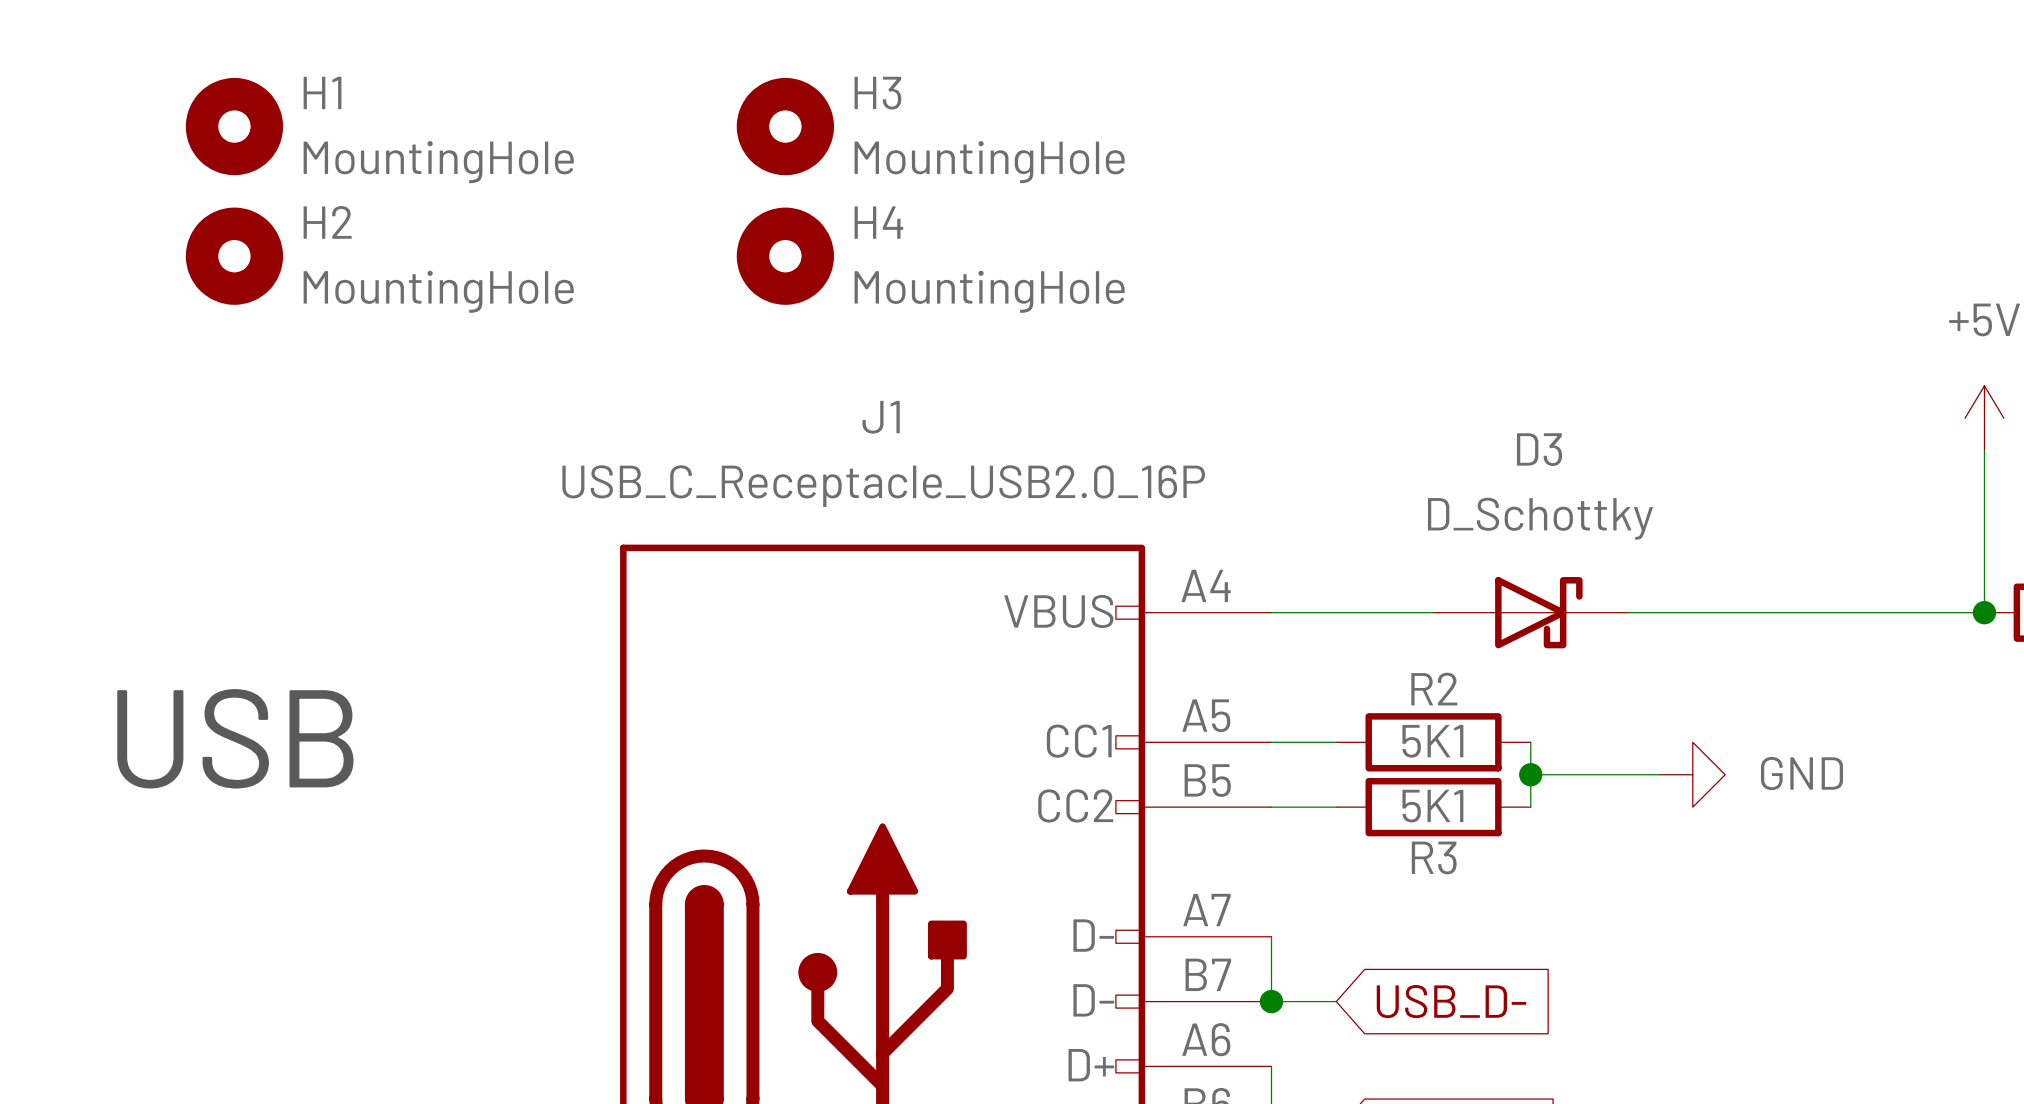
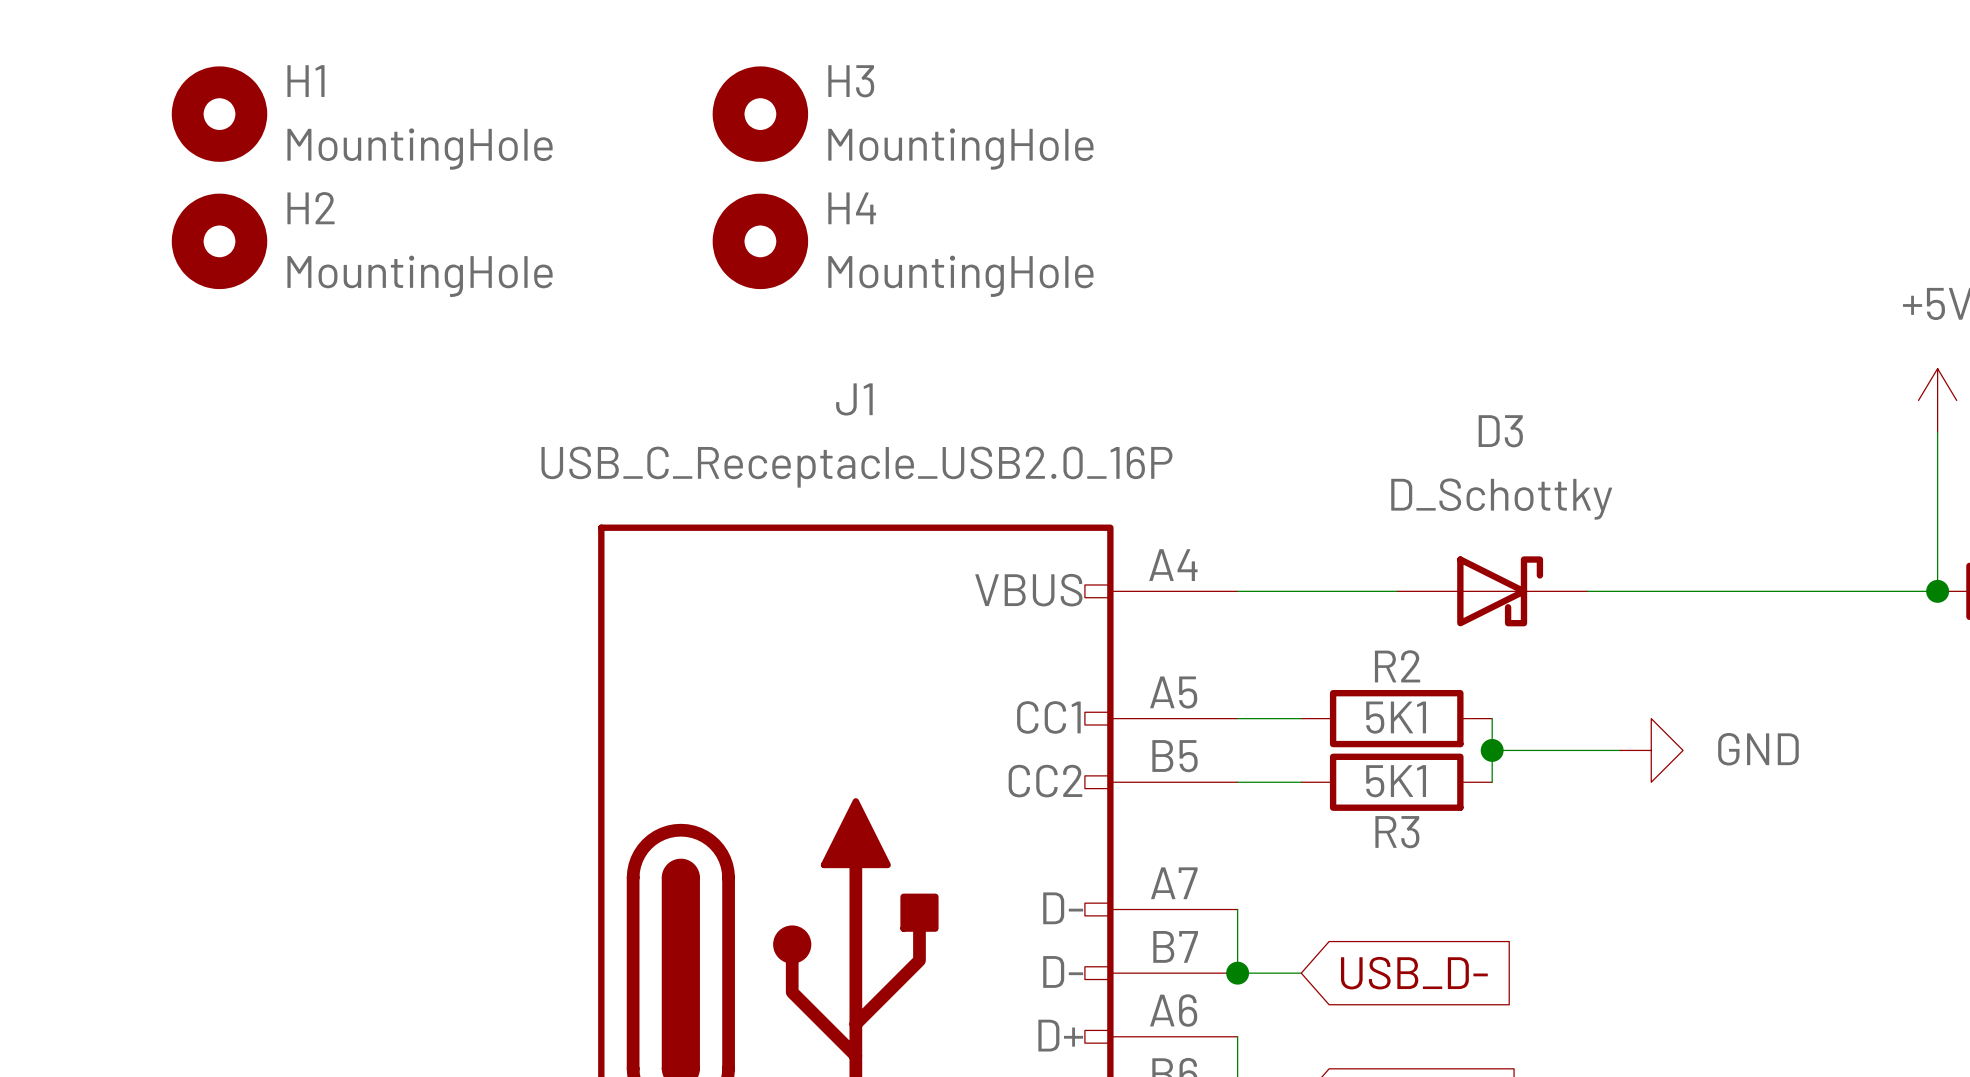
text: USB (235, 738) -> none

